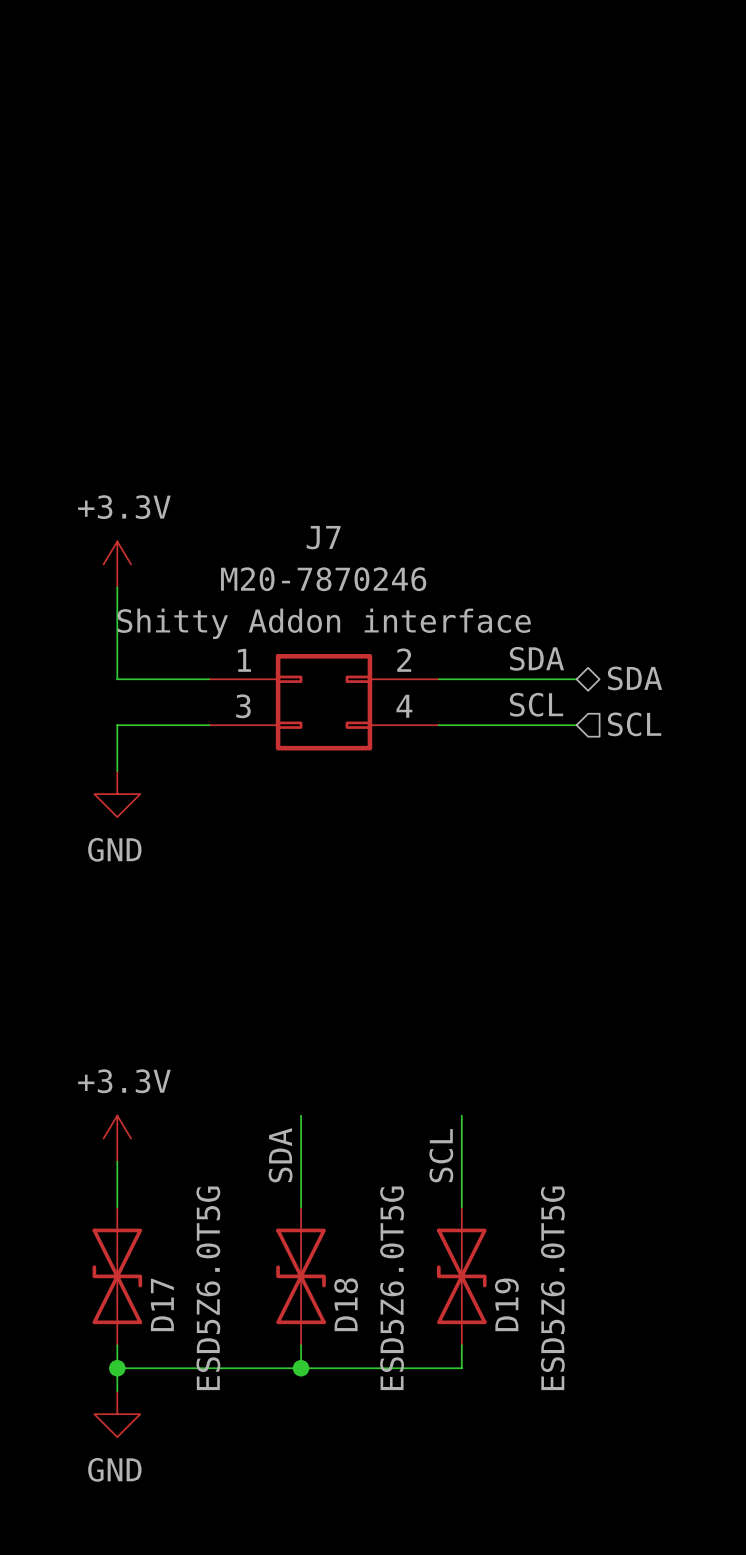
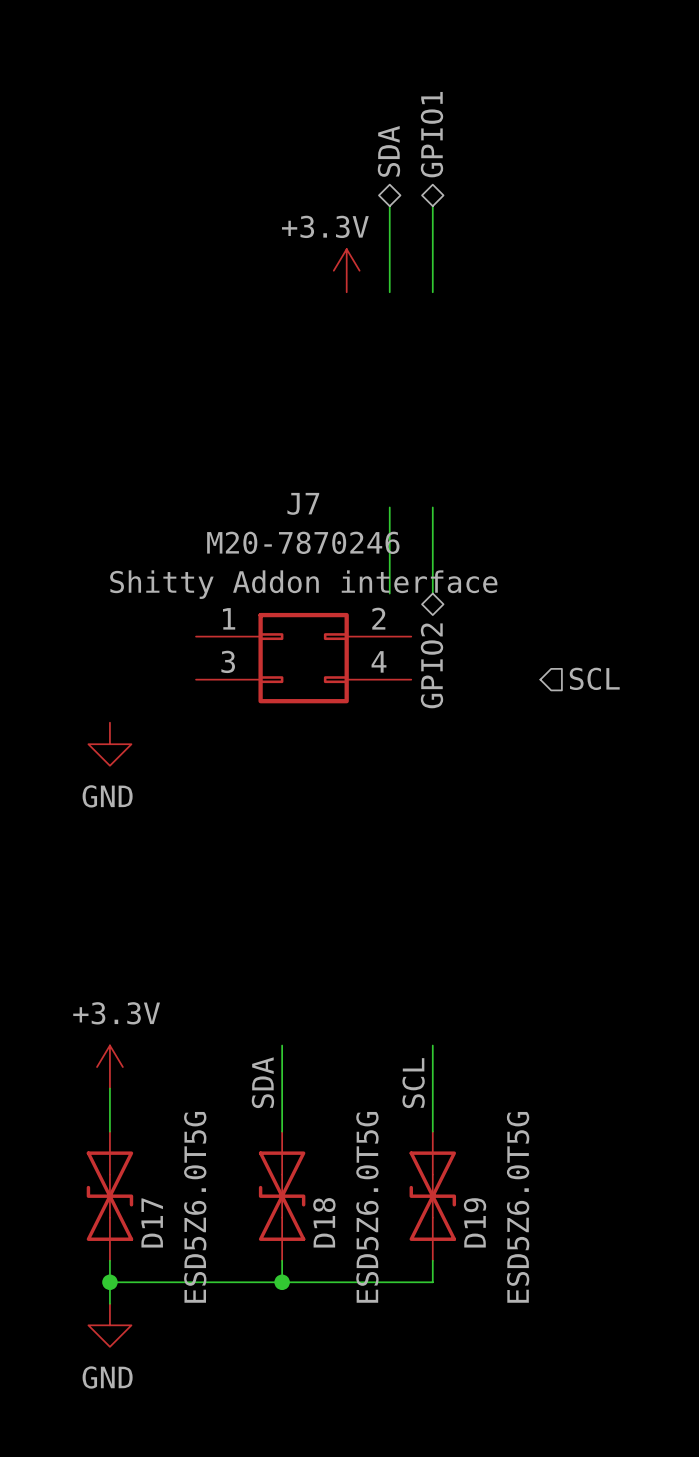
hierarchical label: none -> GPIO1 (431, 134)
hierarchical label: none -> SDA (388, 151)
wire: none -> (389, 206) (389, 292)
wire: none -> (432, 206) (432, 292)
power symbol text position: +3.3V (124, 507) -> +3.3V (325, 226)
wire: none -> (389, 507) (389, 593)
wire: none -> (432, 507) (432, 593)
power symbol position: +3.3V (117, 564) -> +3.3V (346, 270)
wire: (117, 587) (117, 679) (209, 679) -> none
label: SDA (536, 658) -> none
hierarchical label: SDA (635, 678) -> none
wire: (438, 679) (576, 679) -> none
label: SCL (536, 704) -> none
hierarchical label: none -> GPIO2 (431, 665)
wire: (209, 725) (117, 725) (117, 771) -> none
wire: (438, 725) (576, 725) -> none

